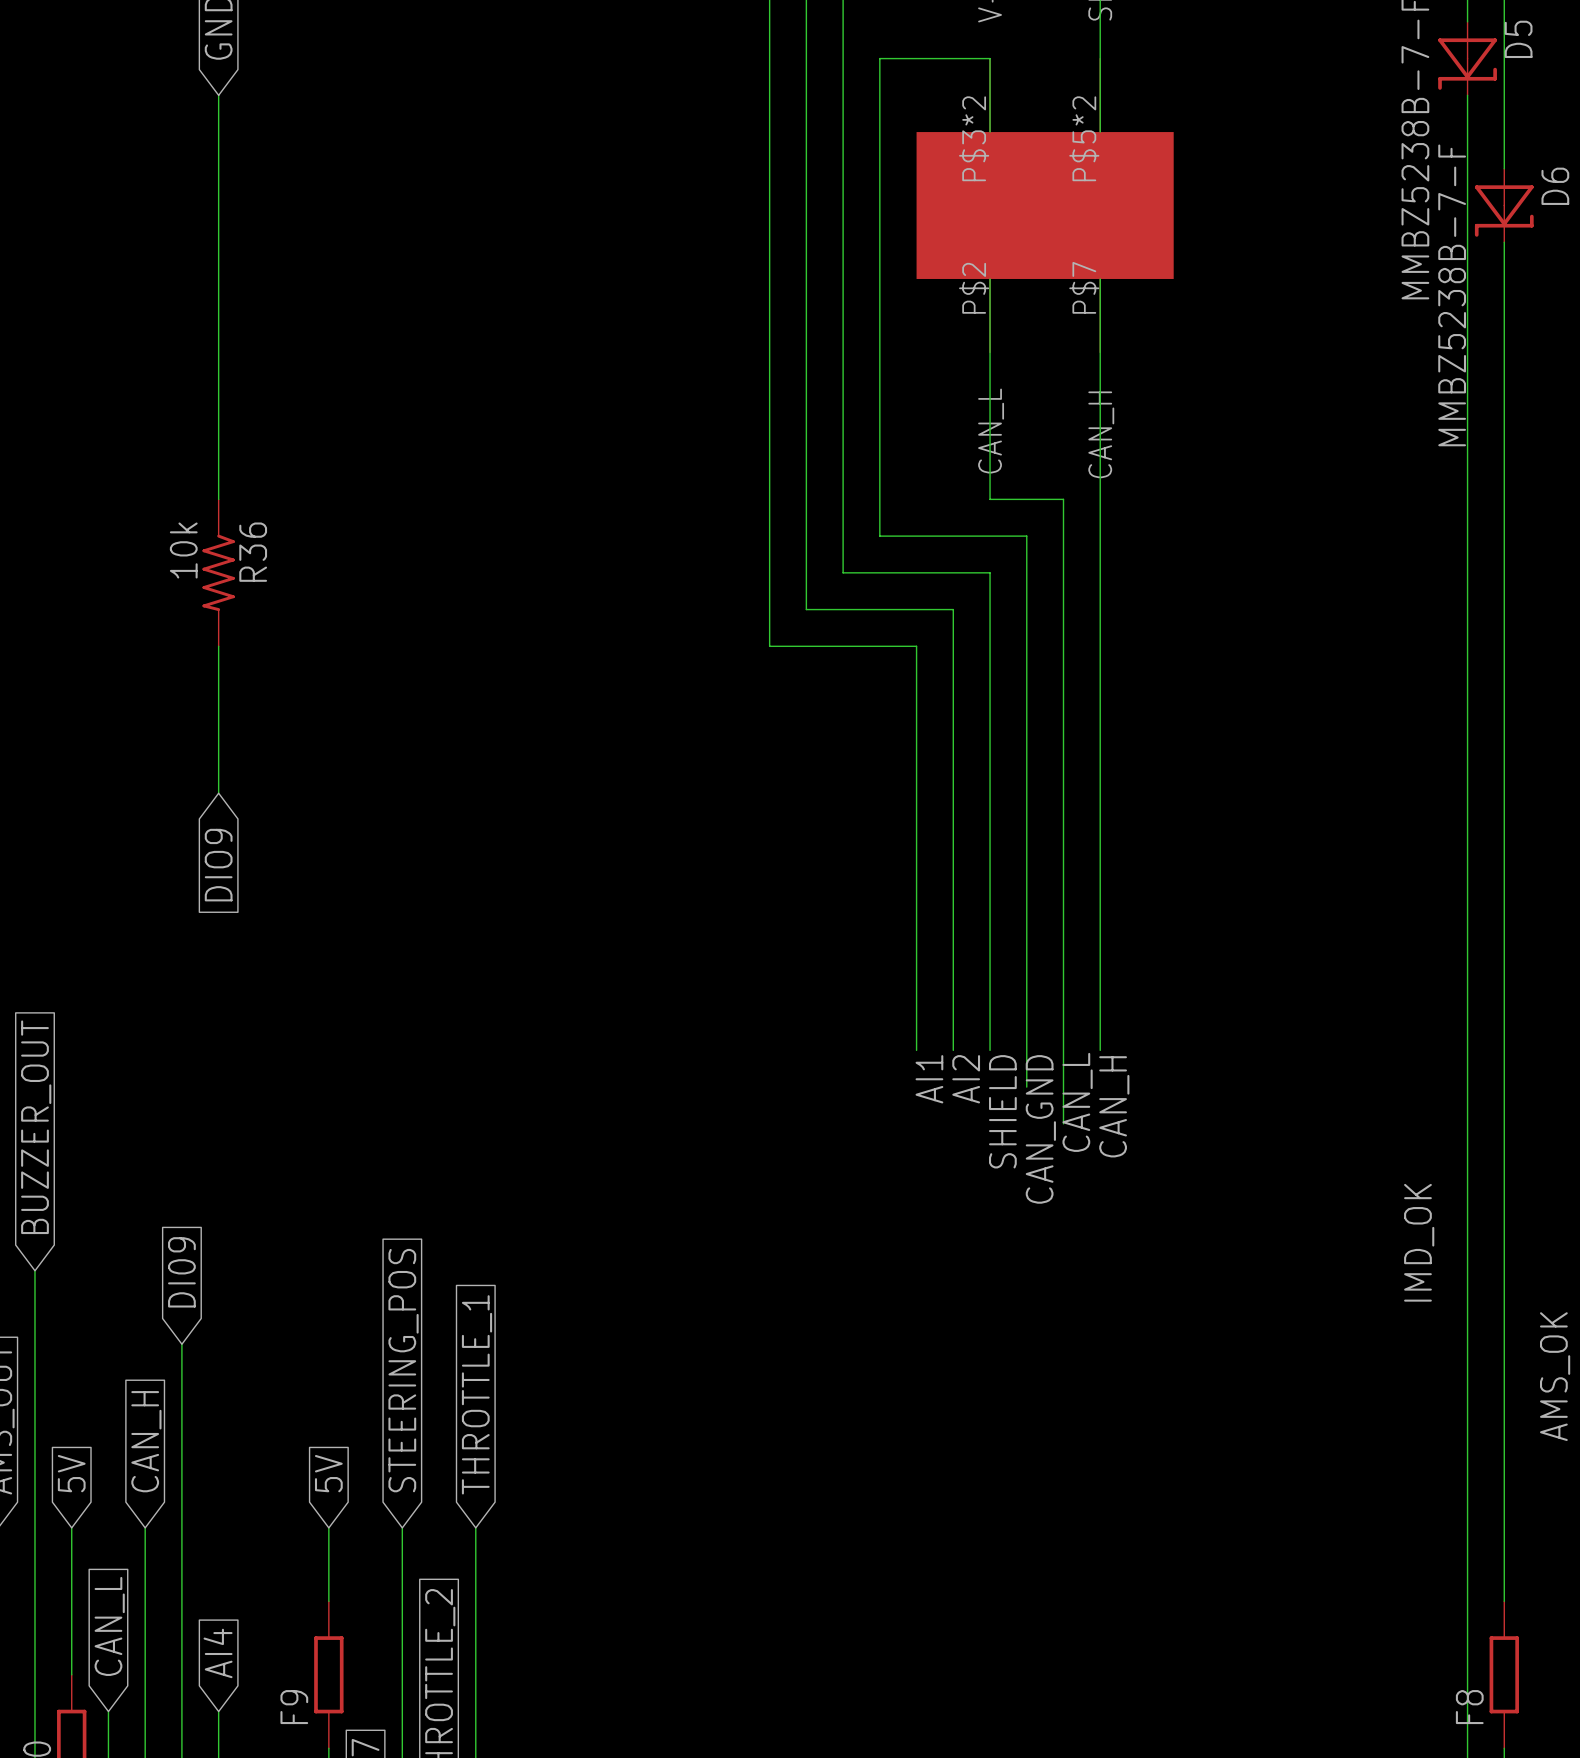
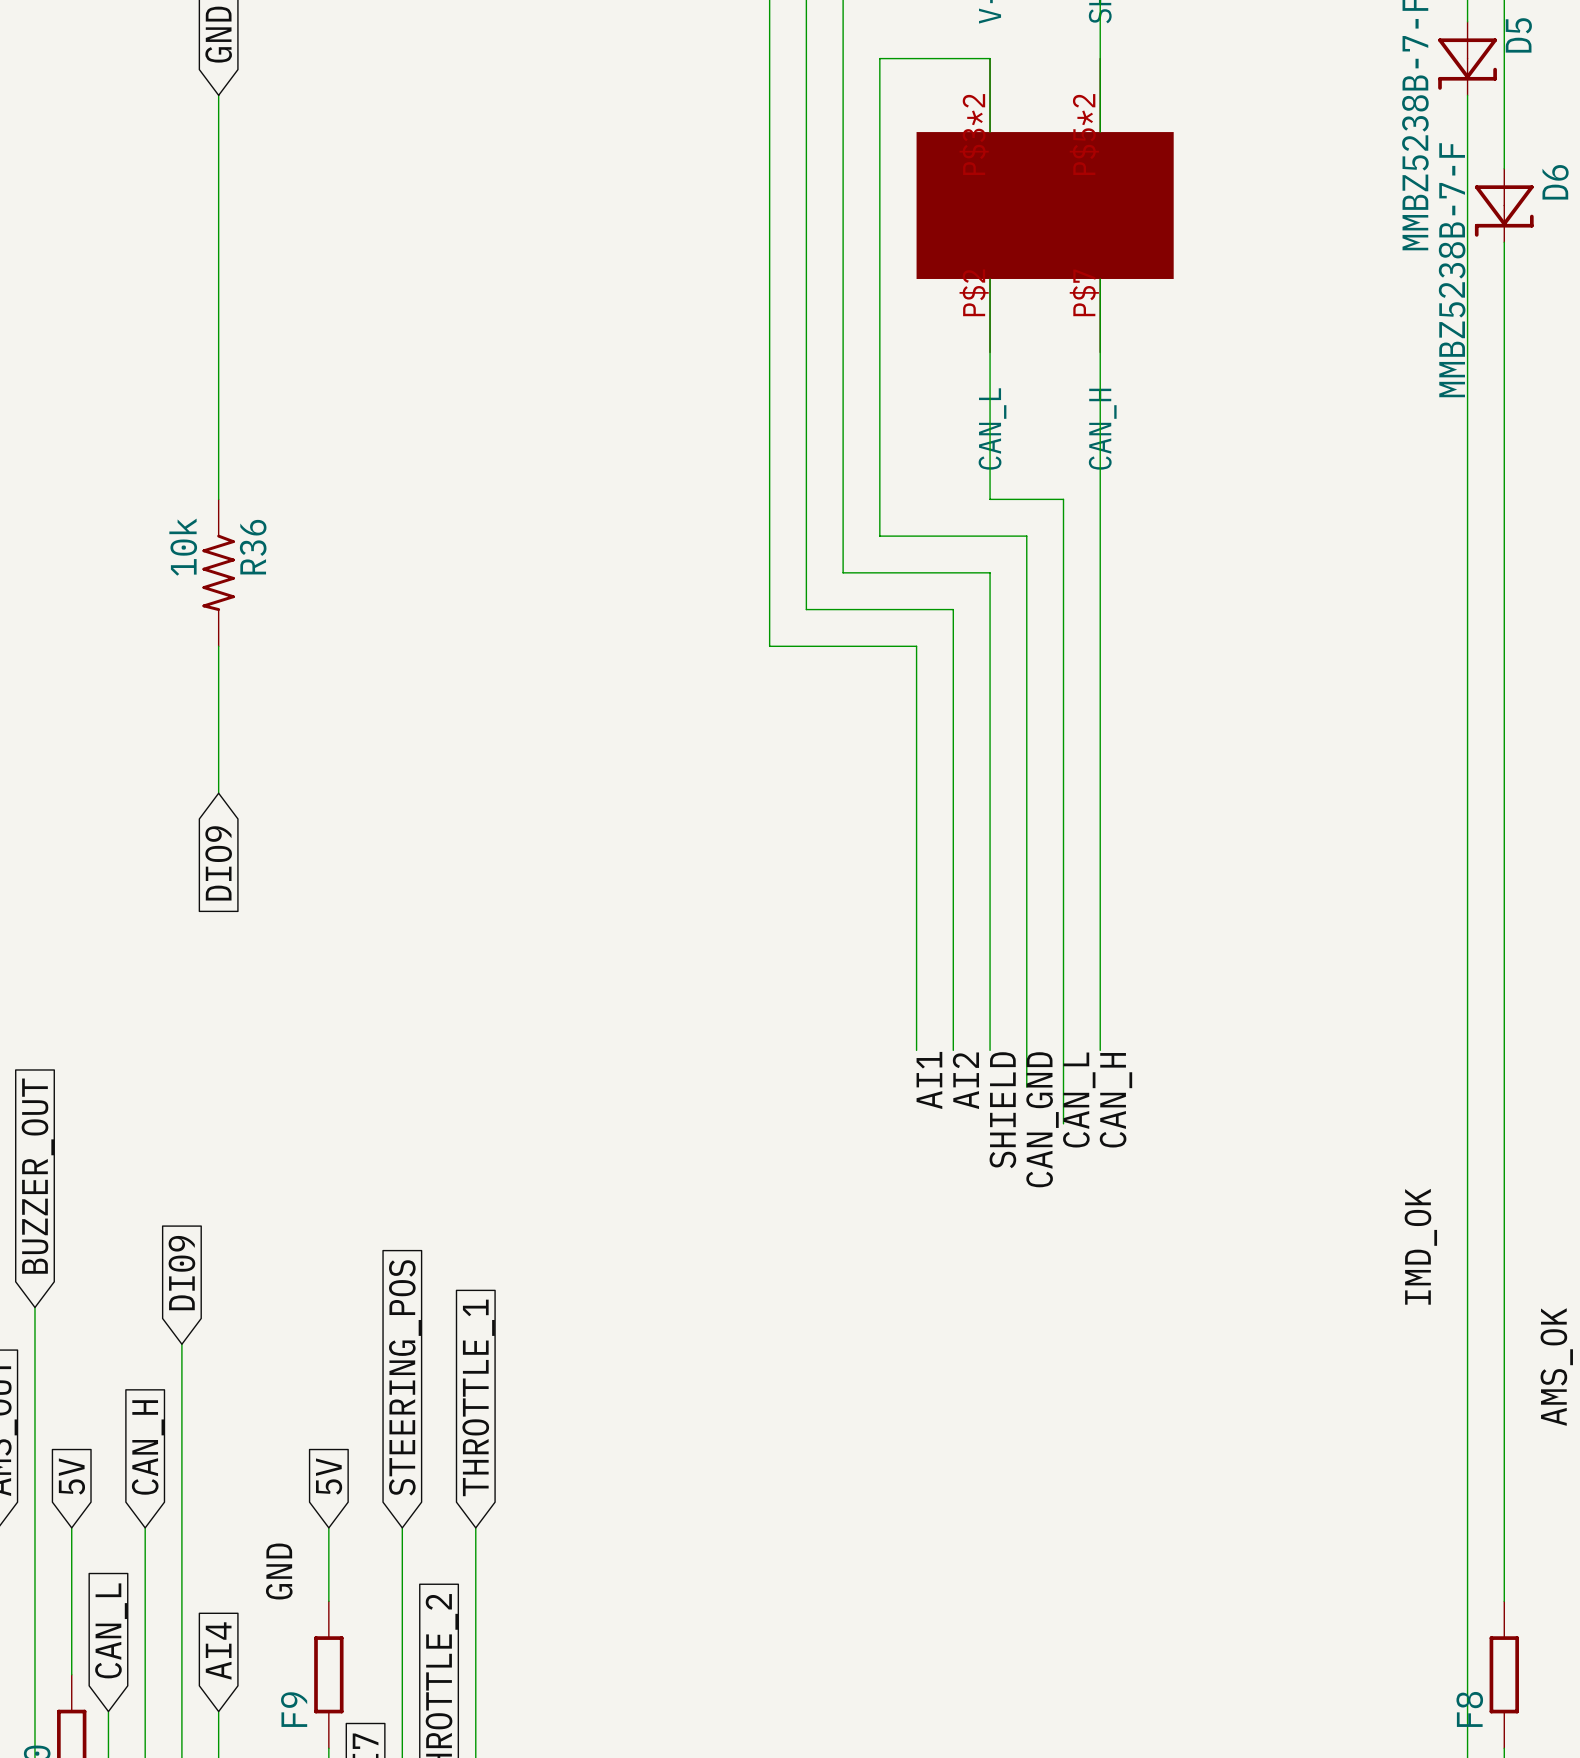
global label position: BUZZER_OUT (36, 1127) -> BUZZER_OUT (37, 1176)
wire: (34, 1270) (34, 1307) -> none
label: none -> GND (279, 1571)

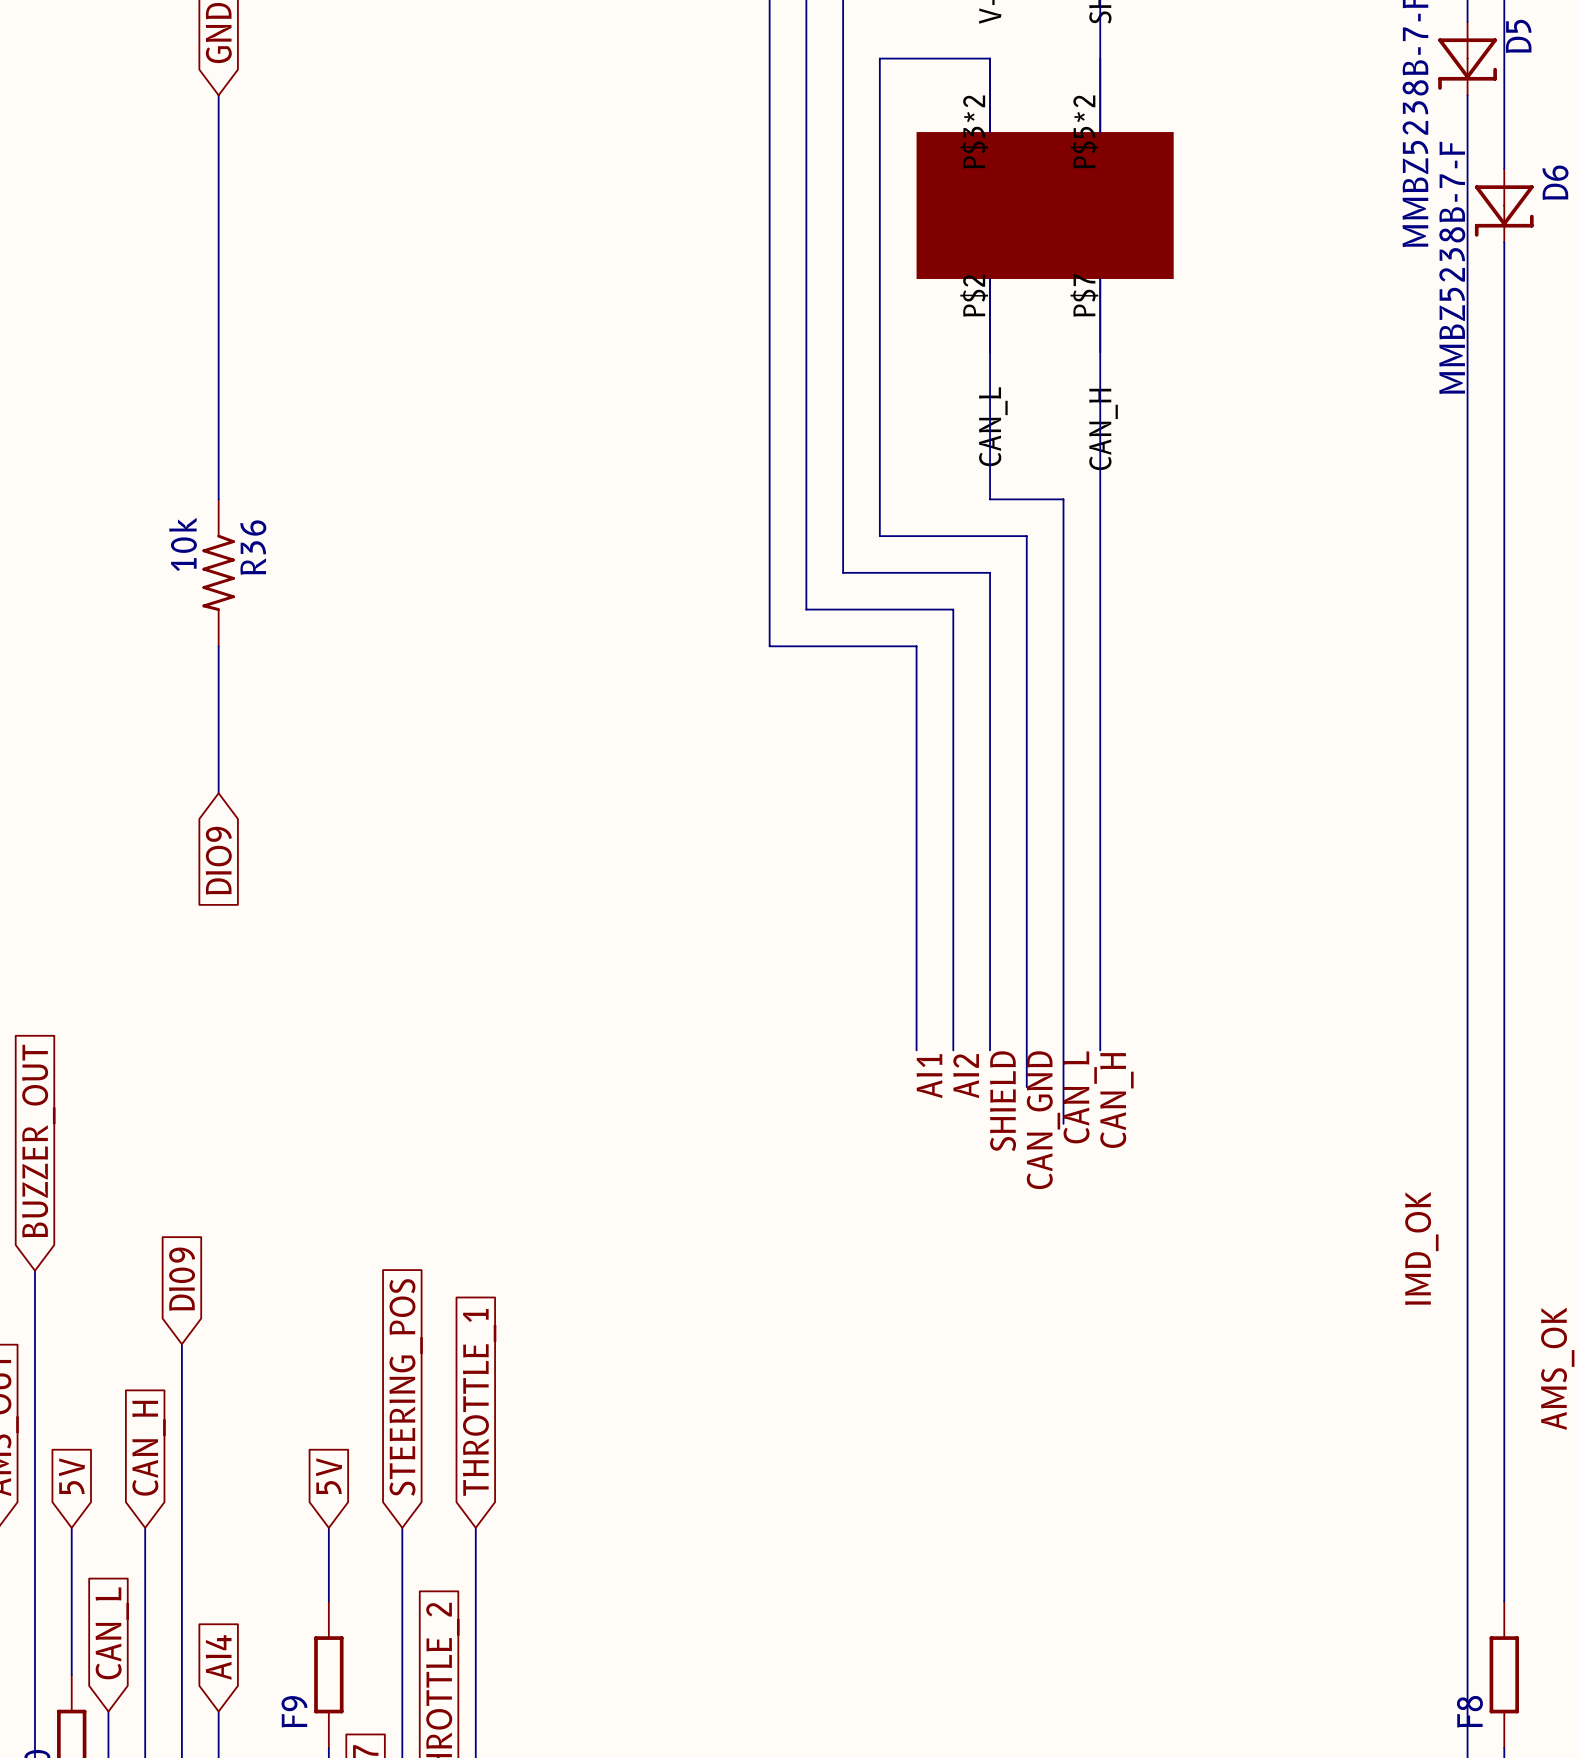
global label position: BUZZER_OUT (37, 1176) -> BUZZER_OUT (38, 1141)
wire: none -> (34, 1270) (34, 1307)
label: GND (279, 1571) -> none

